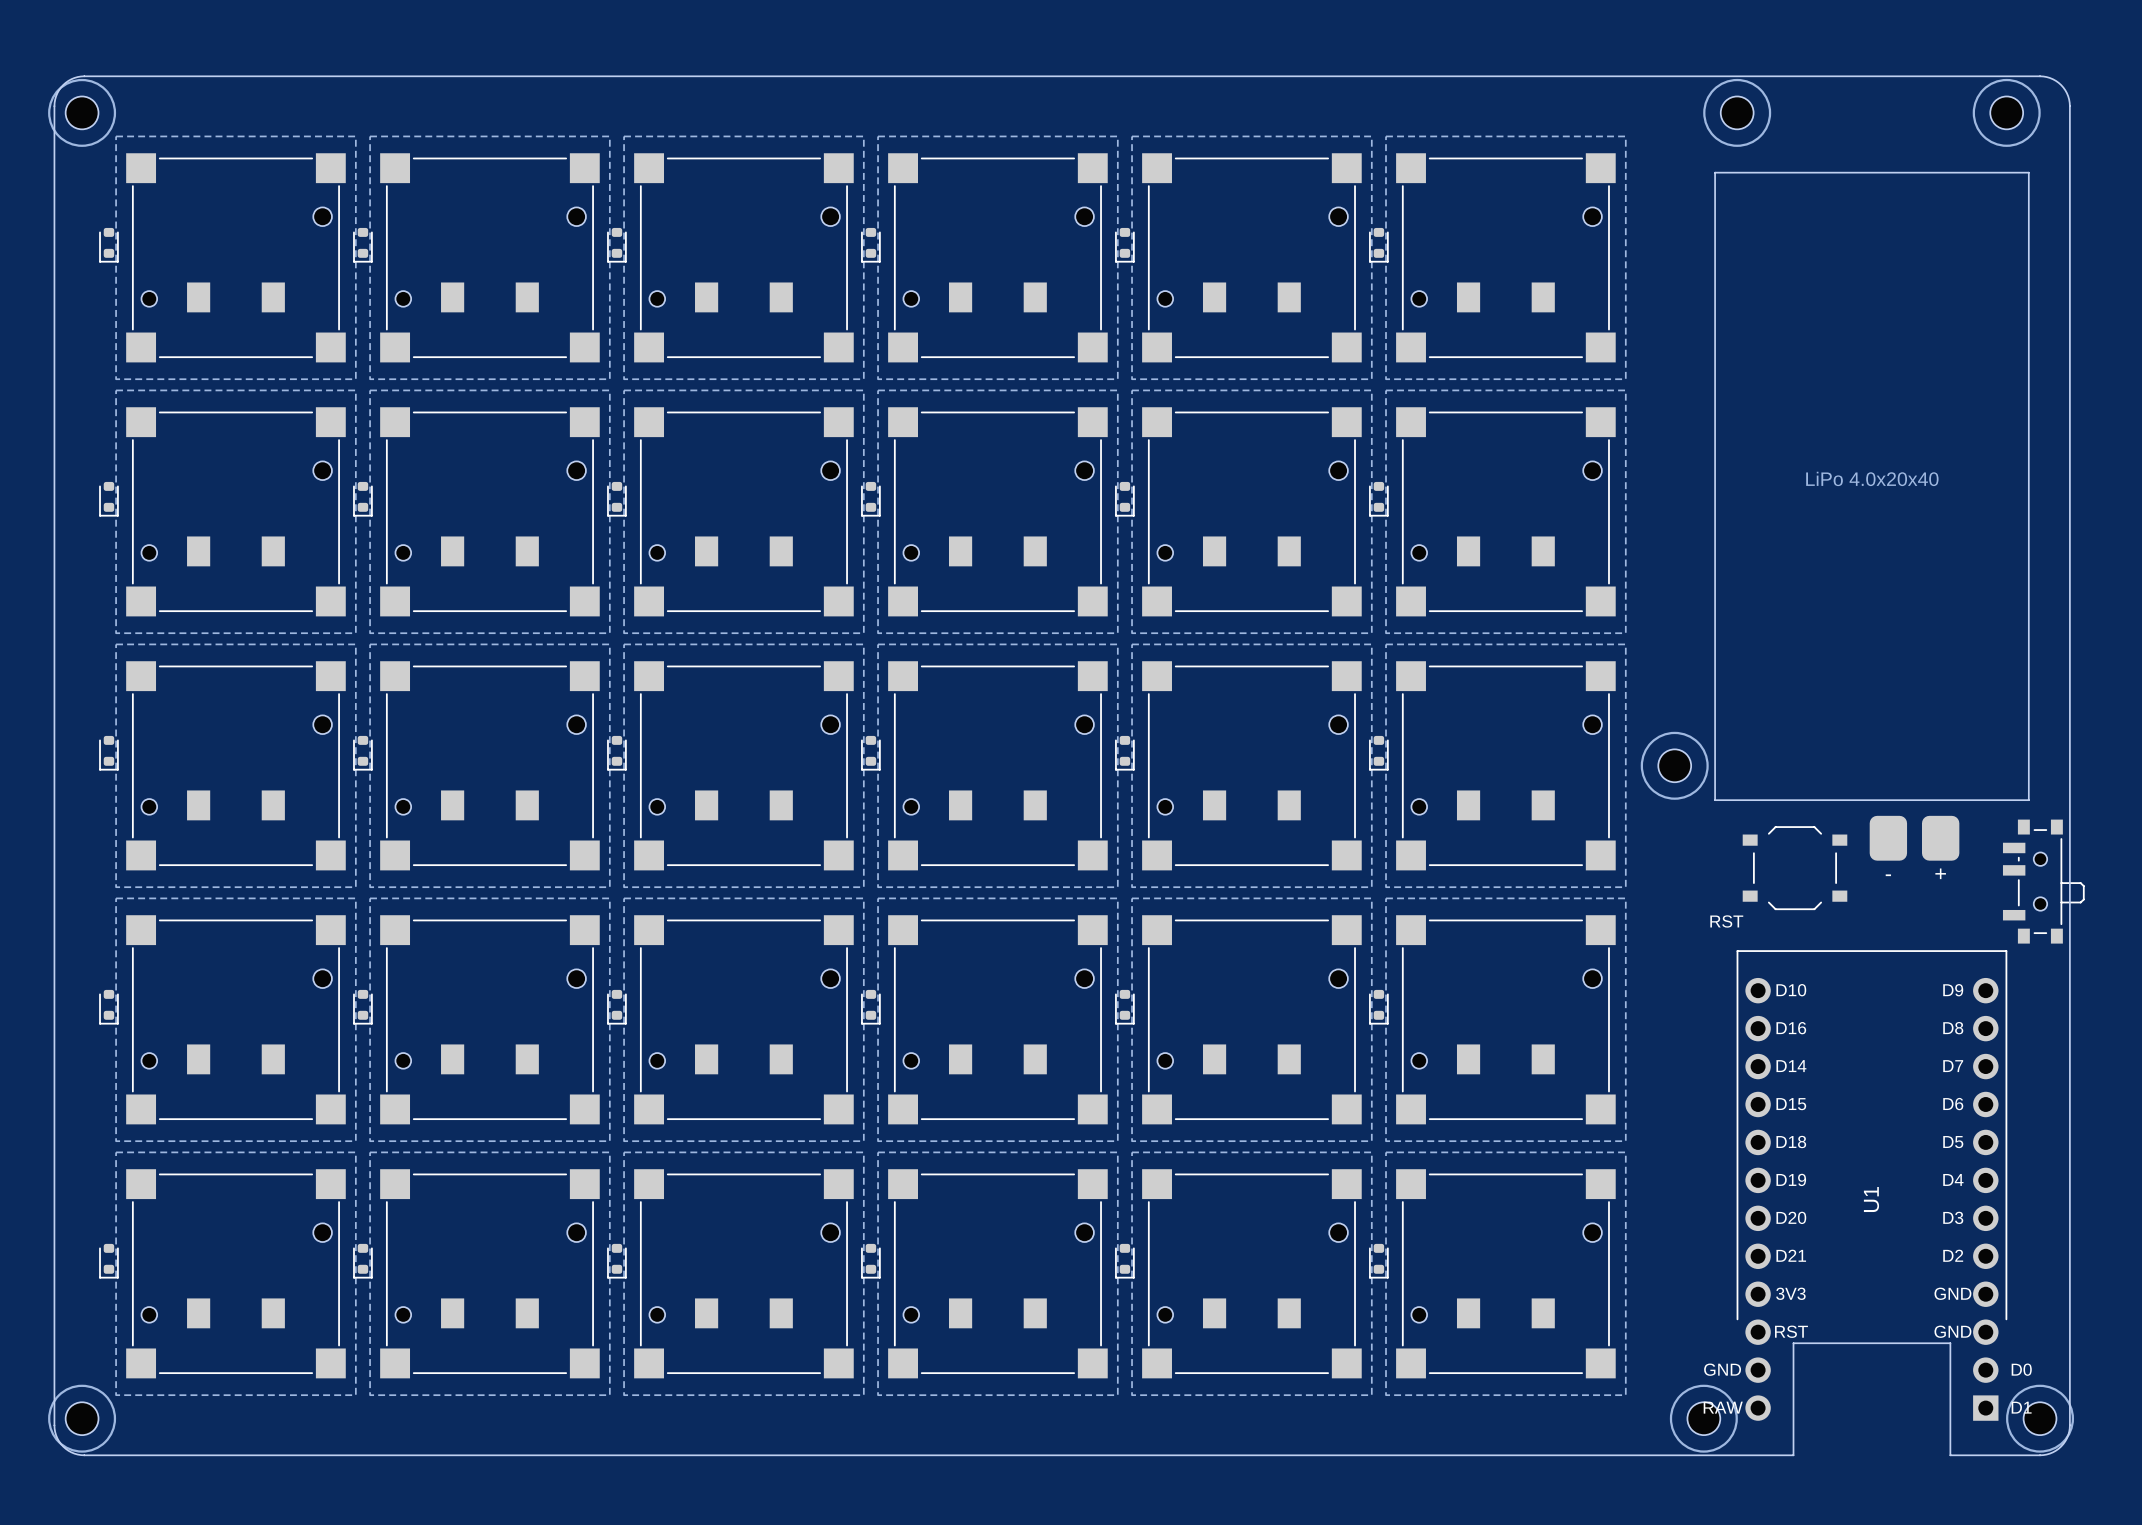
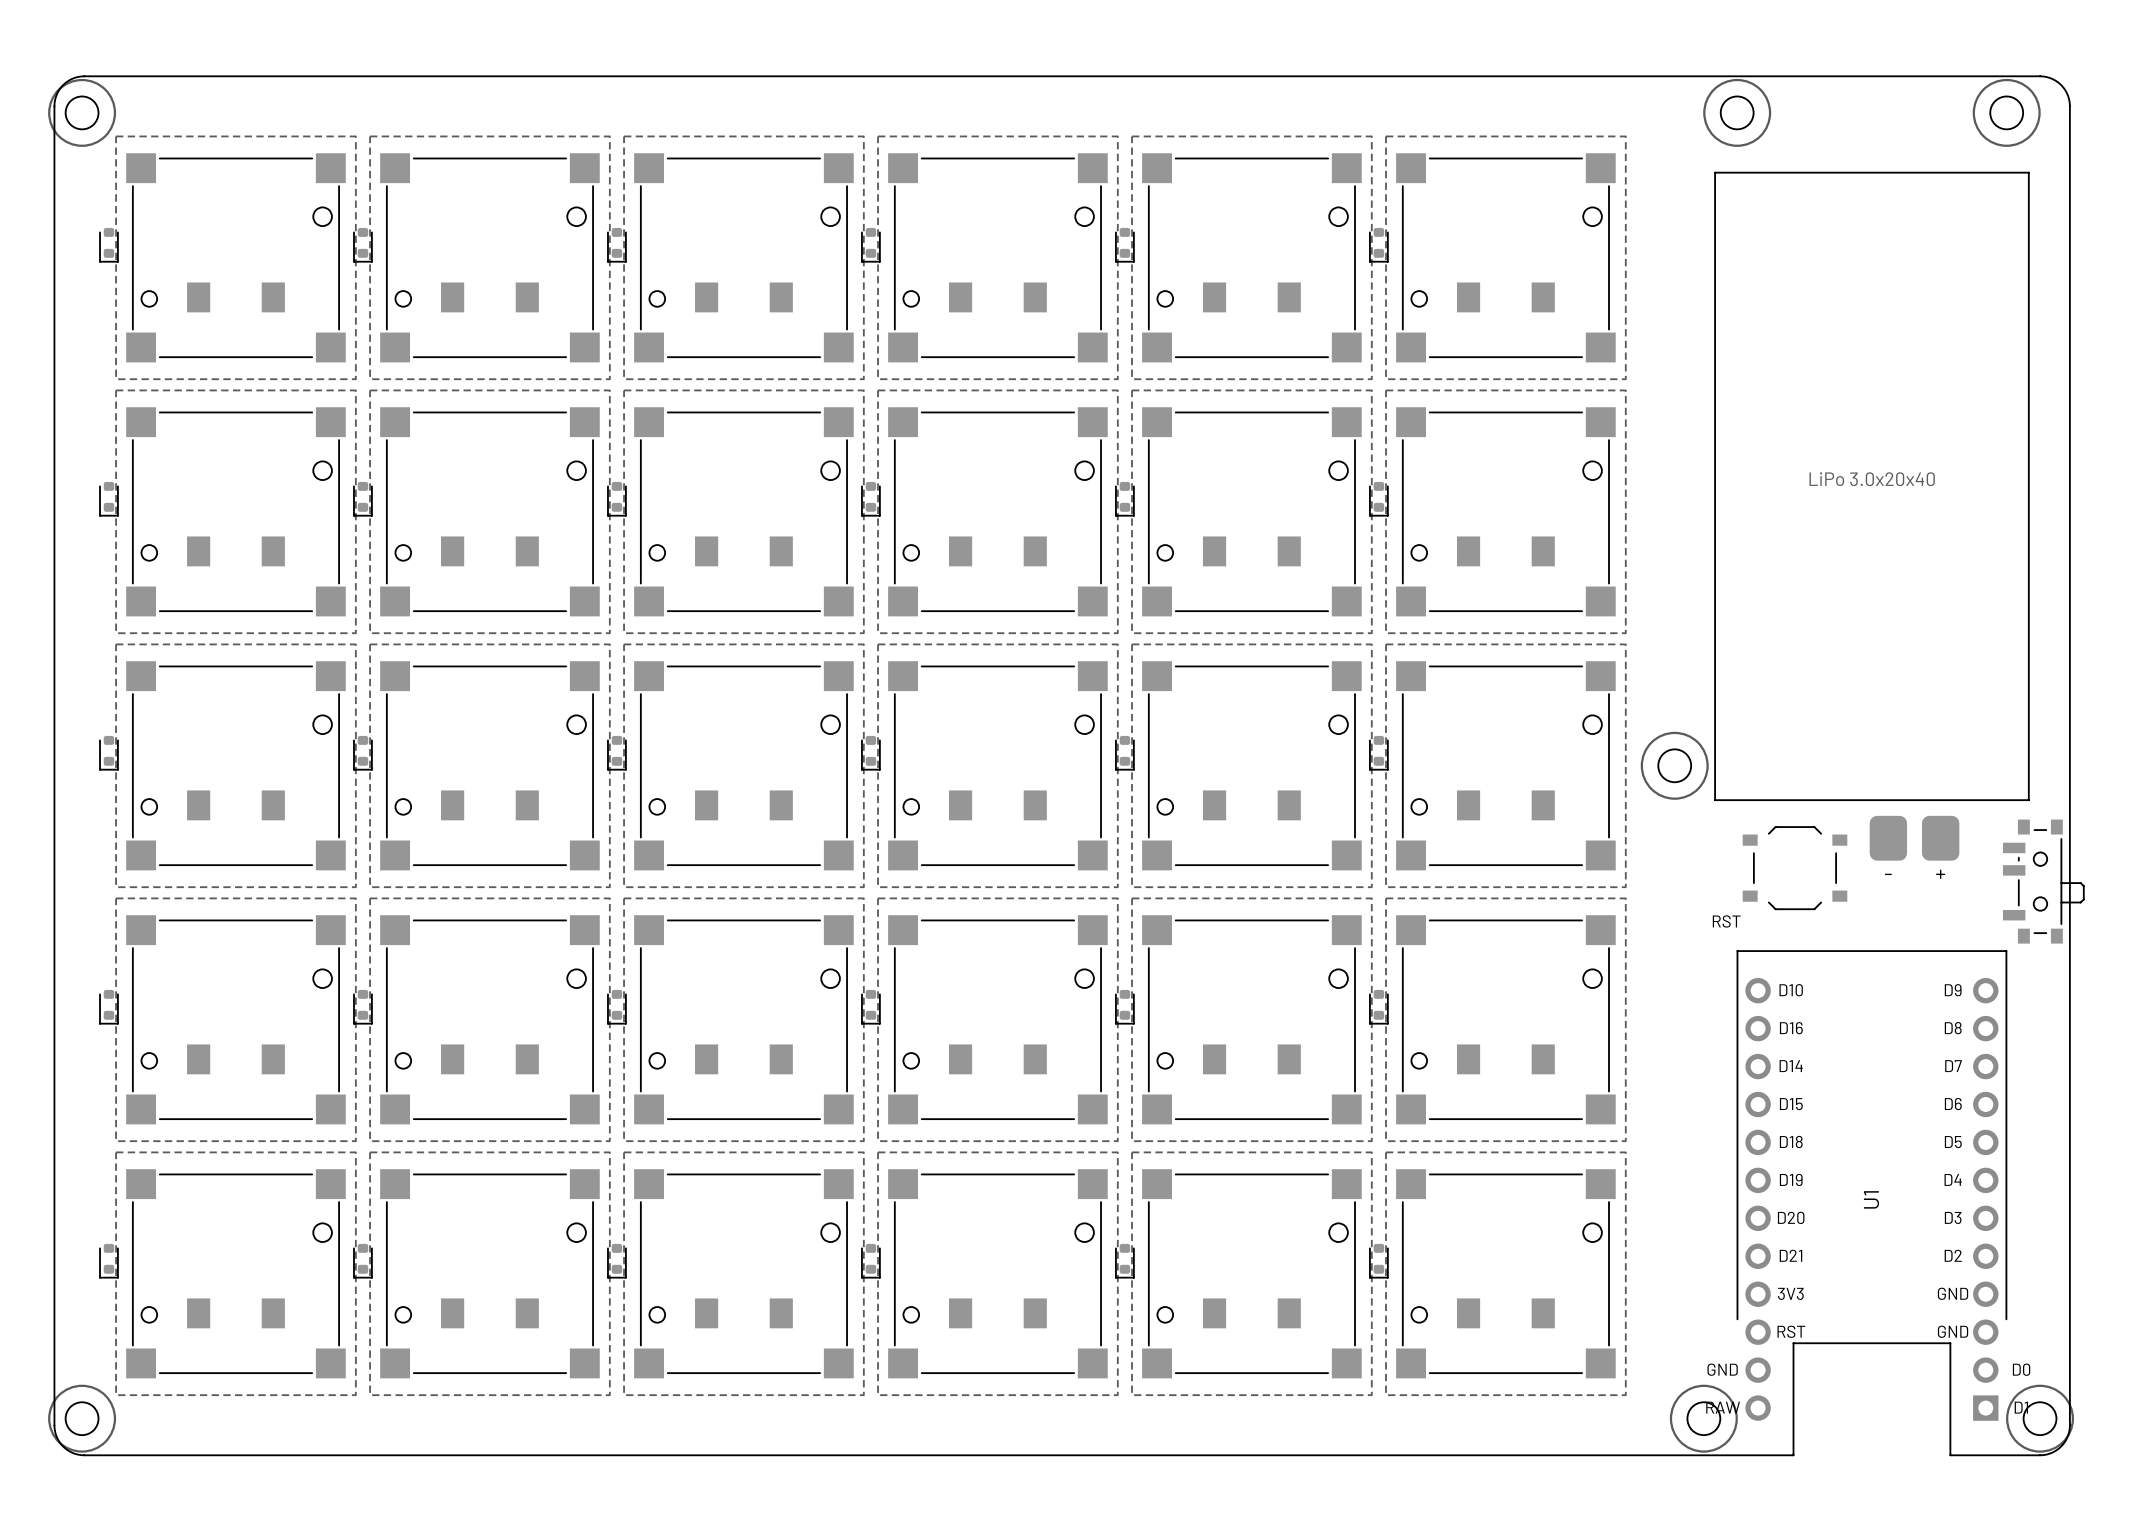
text: LiPo 4.0x20x40 (1872, 478) -> LiPo 3.0x20x40 (1872, 479)

